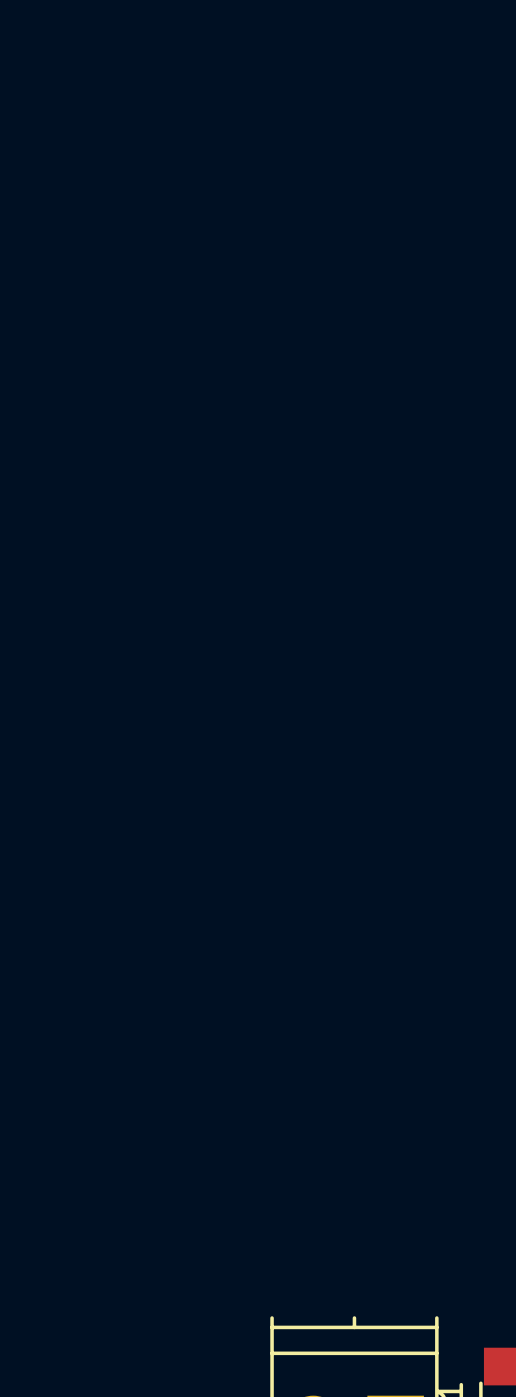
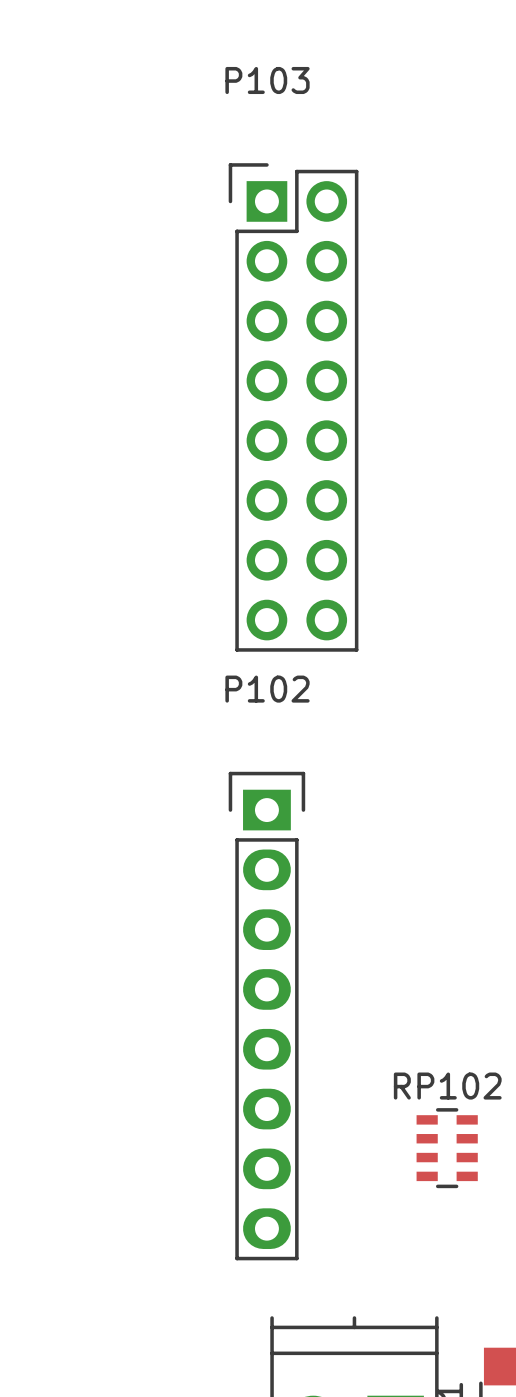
P103: none -> (293, 407)
P102: none -> (266, 1016)
RP102: none -> (447, 1148)

